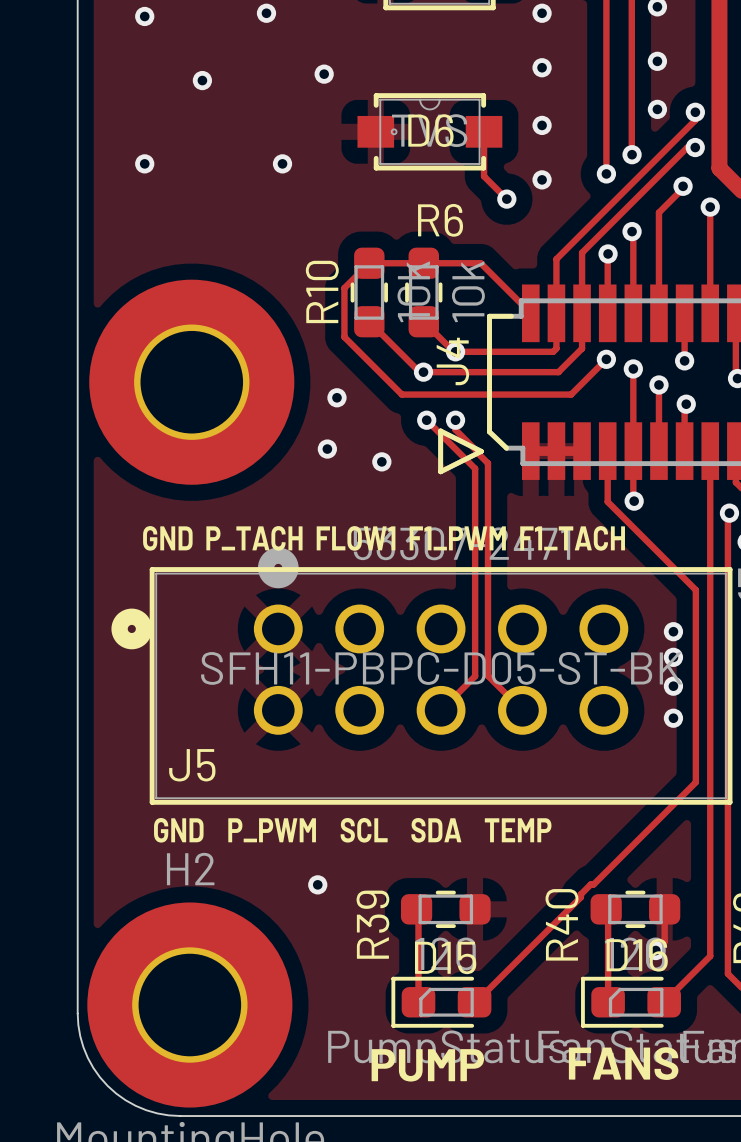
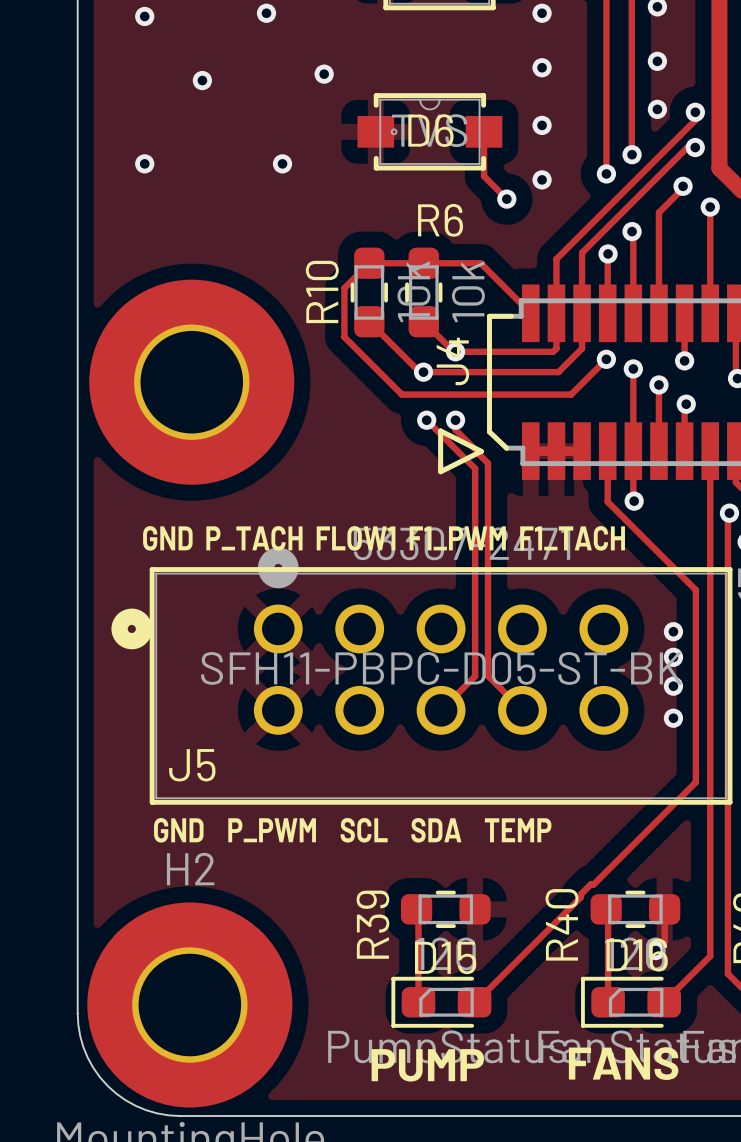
via: (336, 397) -> none
via: (327, 449) -> none
via: (381, 461) -> none
via: (317, 884) -> none

